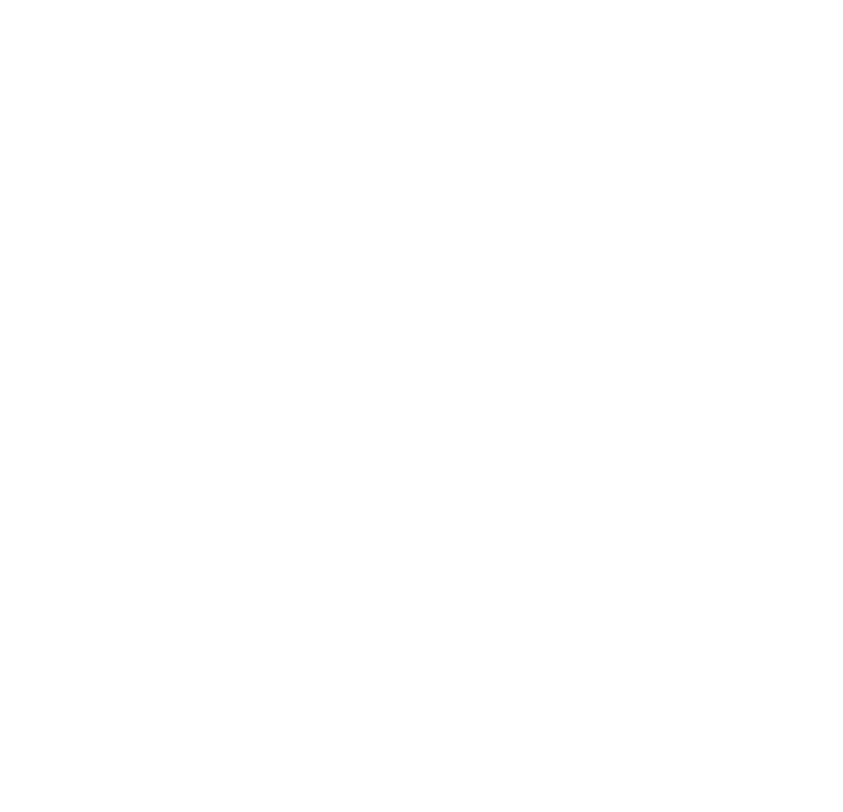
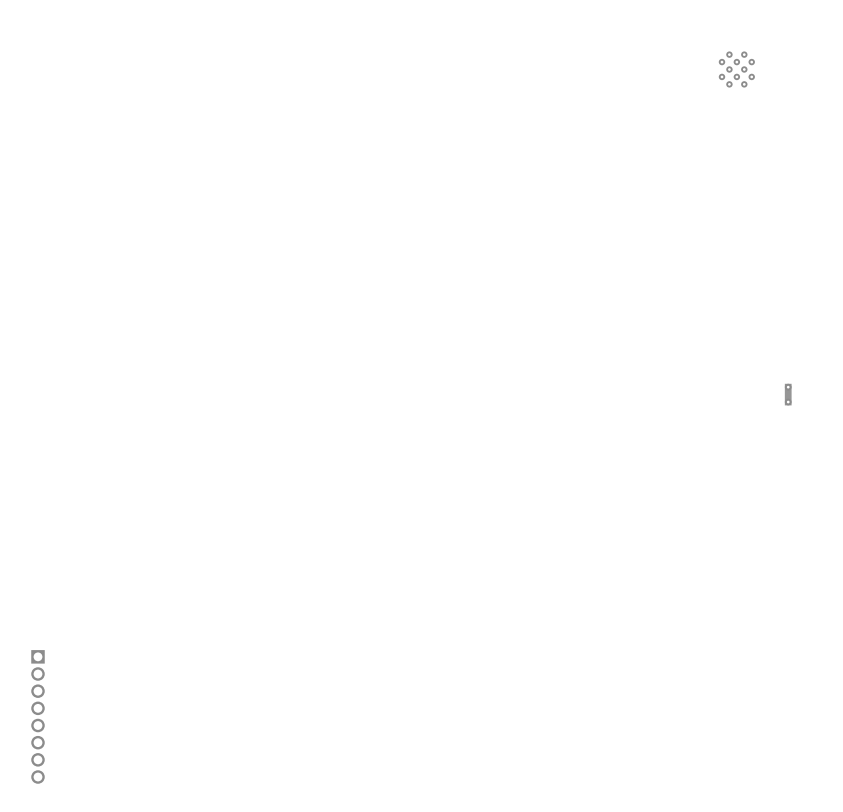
part: none -> (736, 69)
part: none -> (788, 394)
part: none -> (38, 716)

